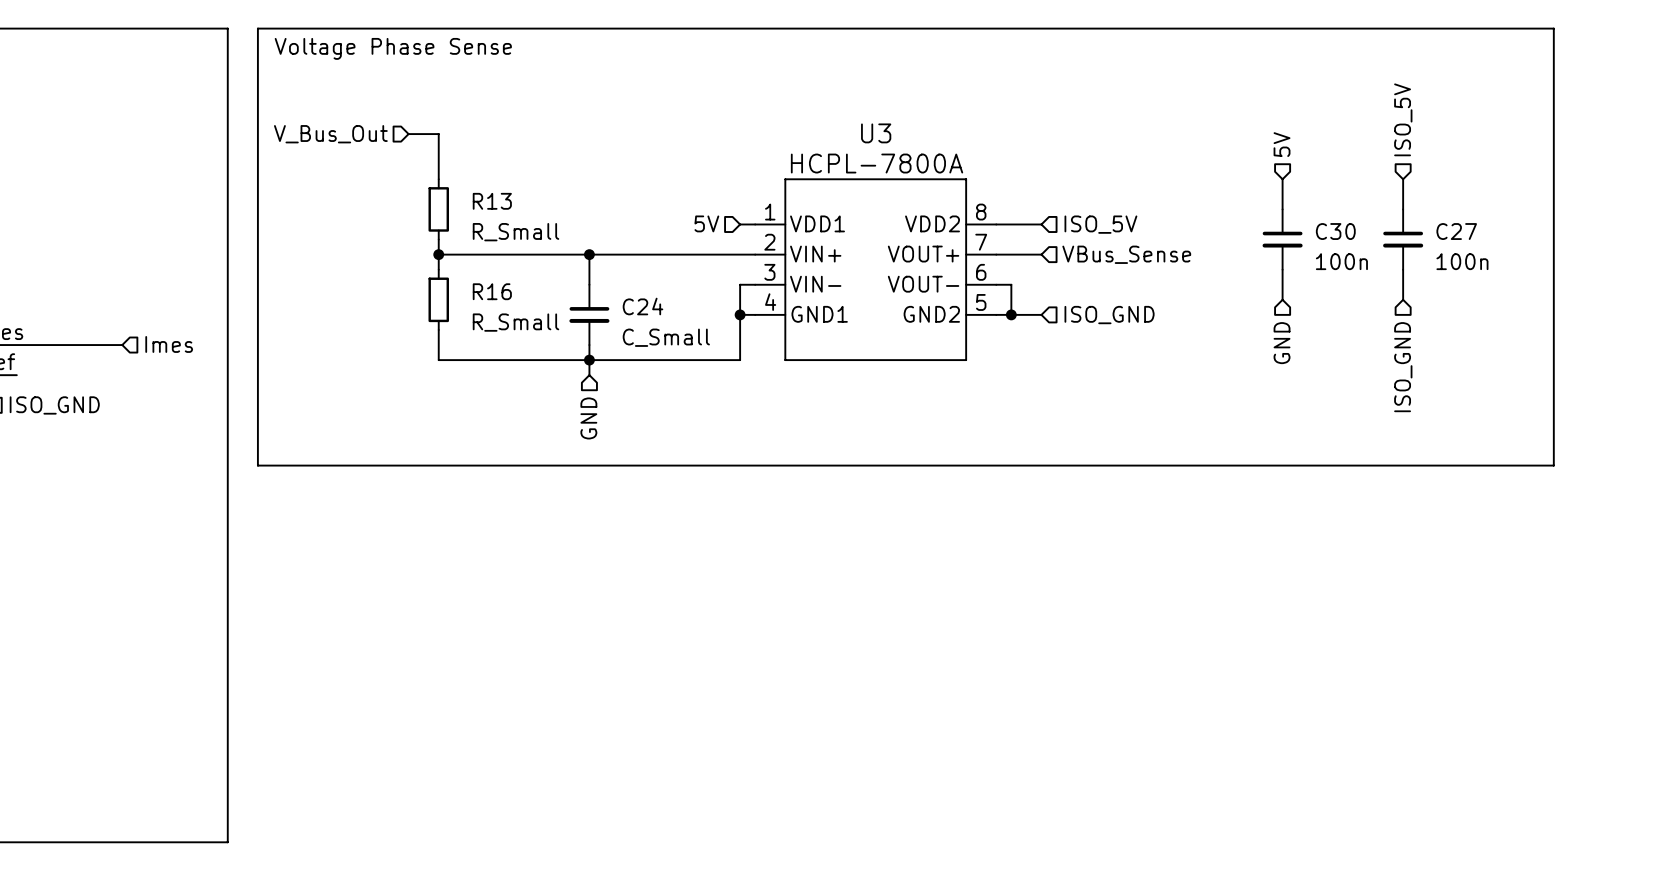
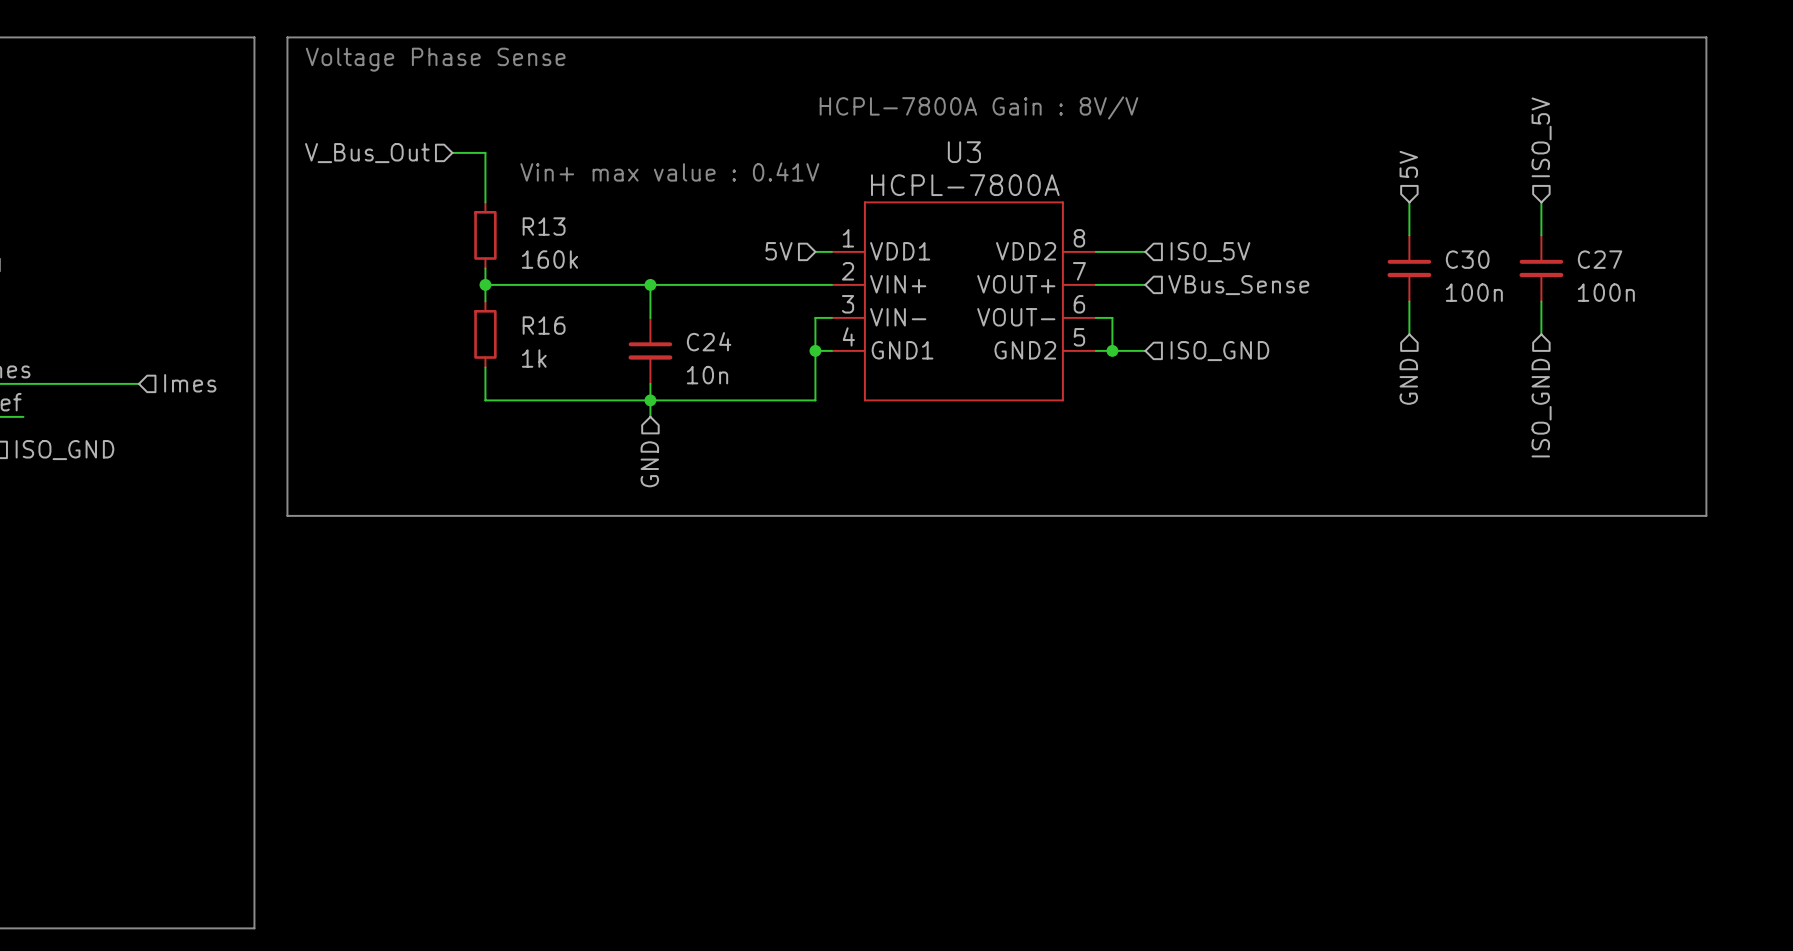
text: none -> HCPL-7800A Gain : 8V/V (978, 107)
text: none -> Vin+ max value : 0.41V (669, 172)
R13 value: R_Small (515, 232) -> 160k (549, 259)
R16 value: R_Small (515, 322) -> 1k (534, 358)
C24 value: C_Small (666, 337) -> 10n (707, 375)

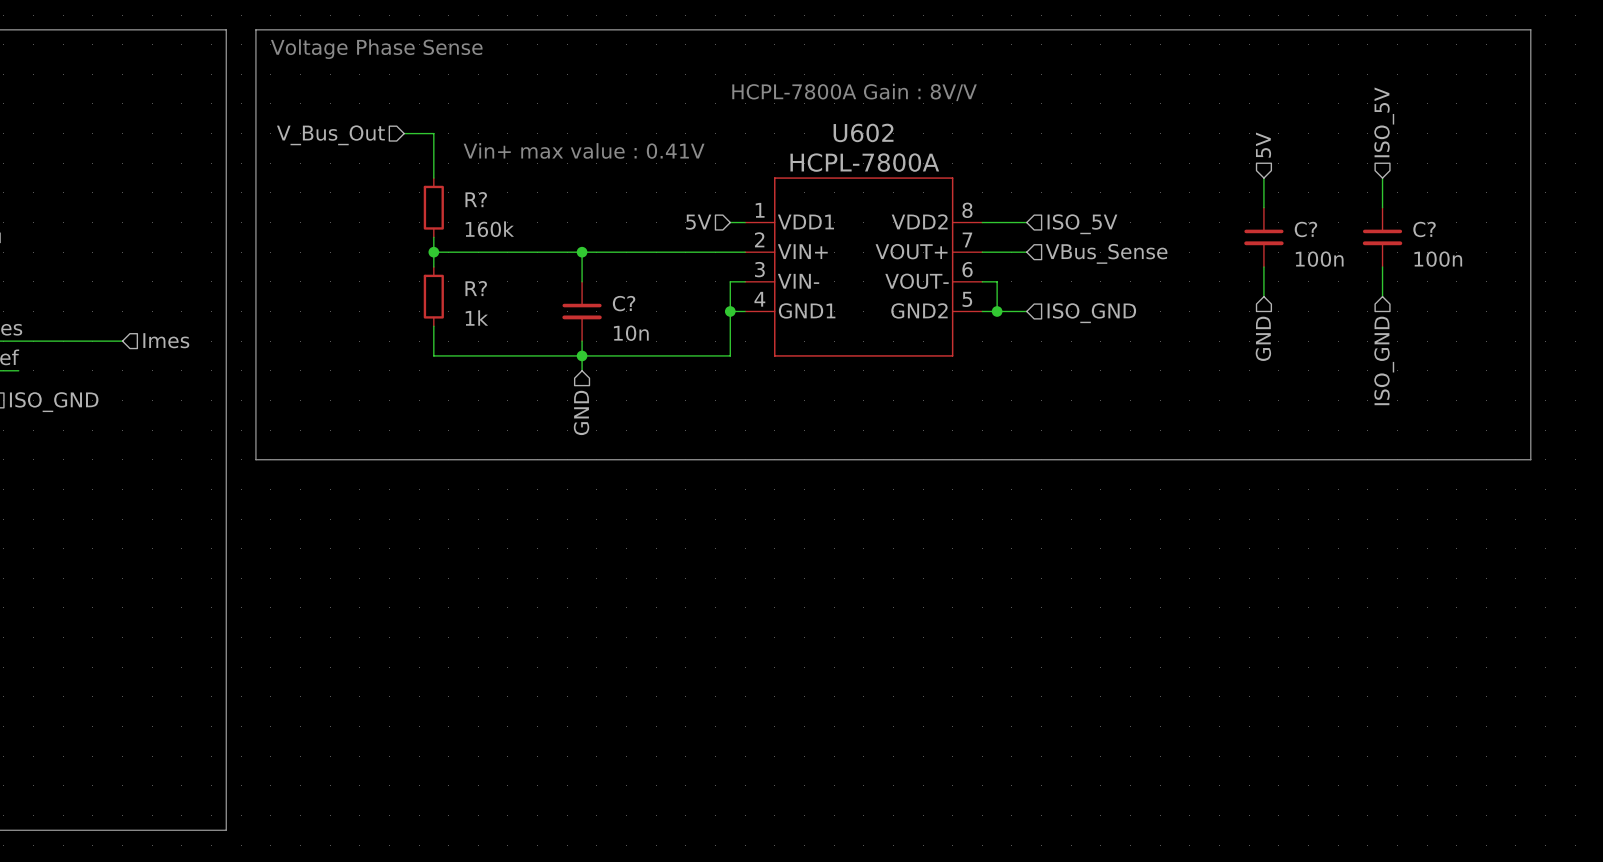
U3 name: U3 (964, 152) -> U602 (863, 132)
R13 name: R13 (544, 226) -> R? (476, 199)
C30 name: C30 (1467, 259) -> C? (1305, 229)
C27 name: C27 (1600, 259) -> C? (1424, 229)
R16 name: R16 (544, 325) -> R? (476, 288)
C24 name: C24 (709, 341) -> C? (624, 303)

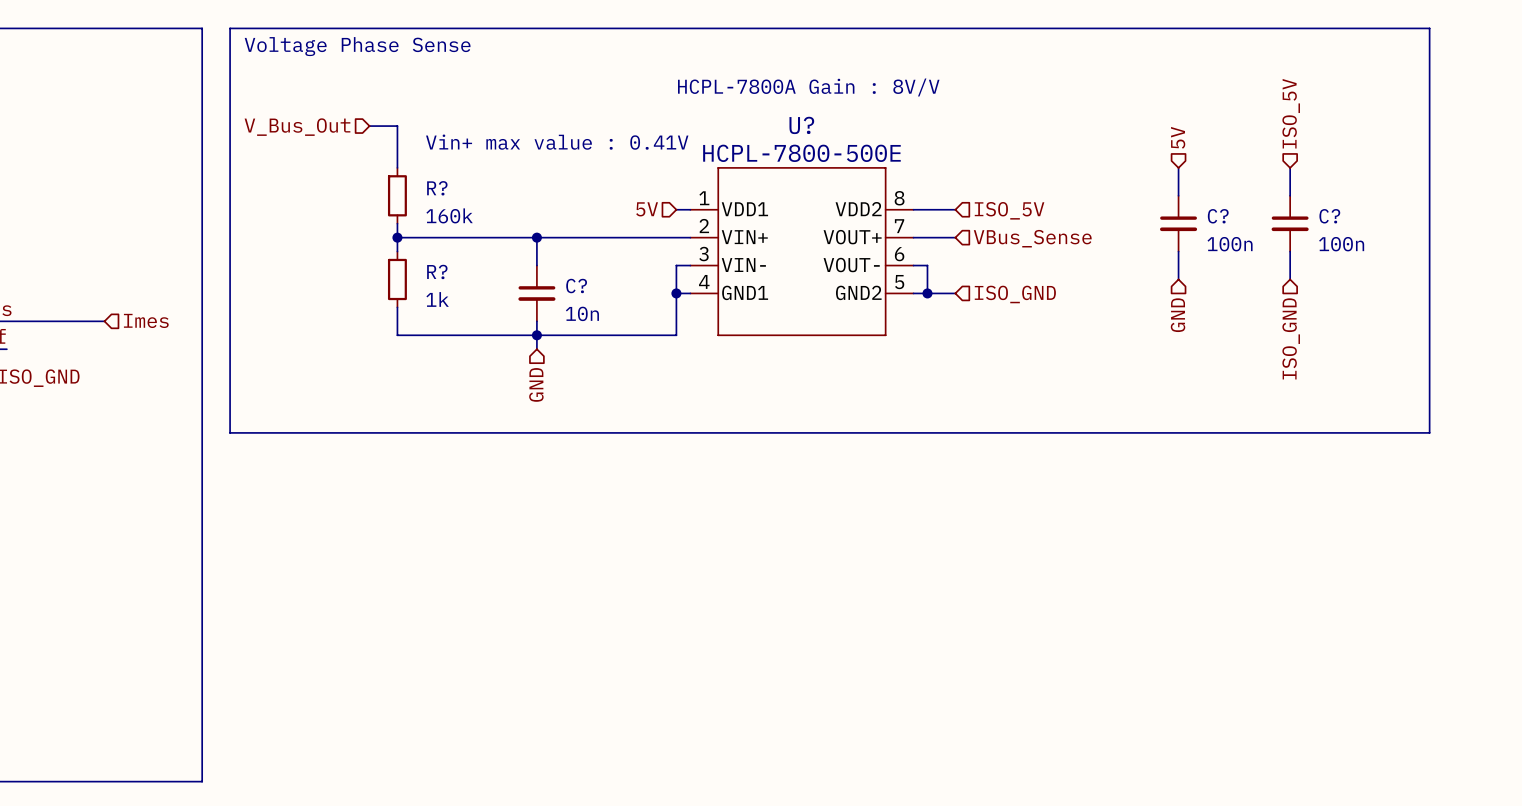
U602 name: U602 (863, 132) -> U? (801, 125)
U602 value: HCPL-7800A (864, 162) -> HCPL-7800-500E (801, 153)

